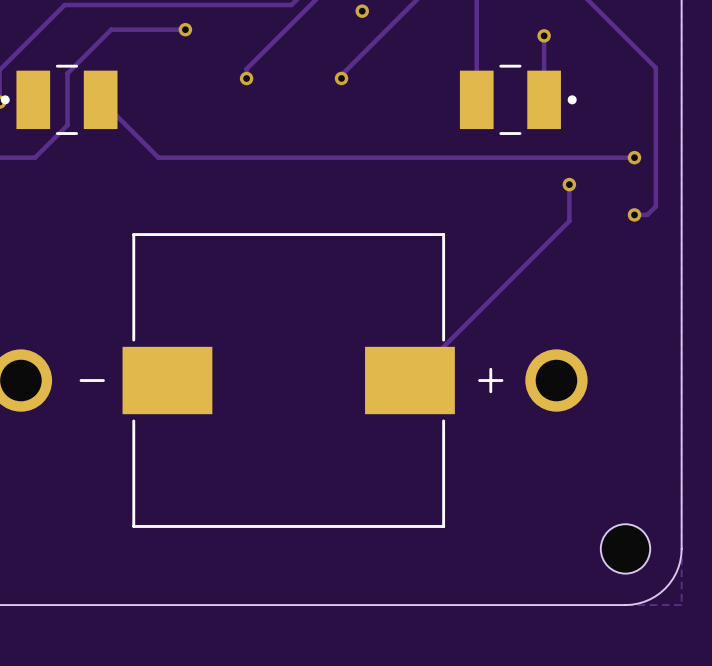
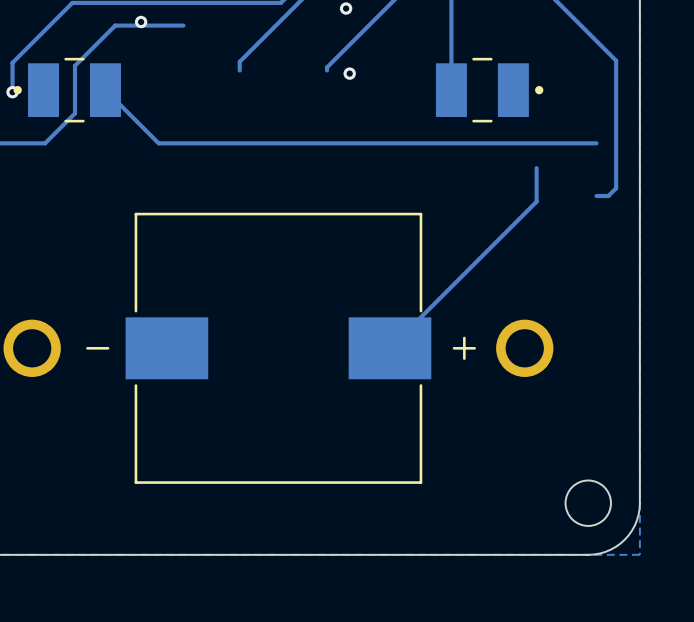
via: none -> (141, 21)
via: (185, 29) -> none
track: (544, 35) (544, 99) -> none
via: (544, 35) -> none
via: (246, 78) -> none
via position: (341, 78) -> (349, 73)
via: (634, 157) -> none
via: (569, 184) -> none
via: (634, 214) -> none

